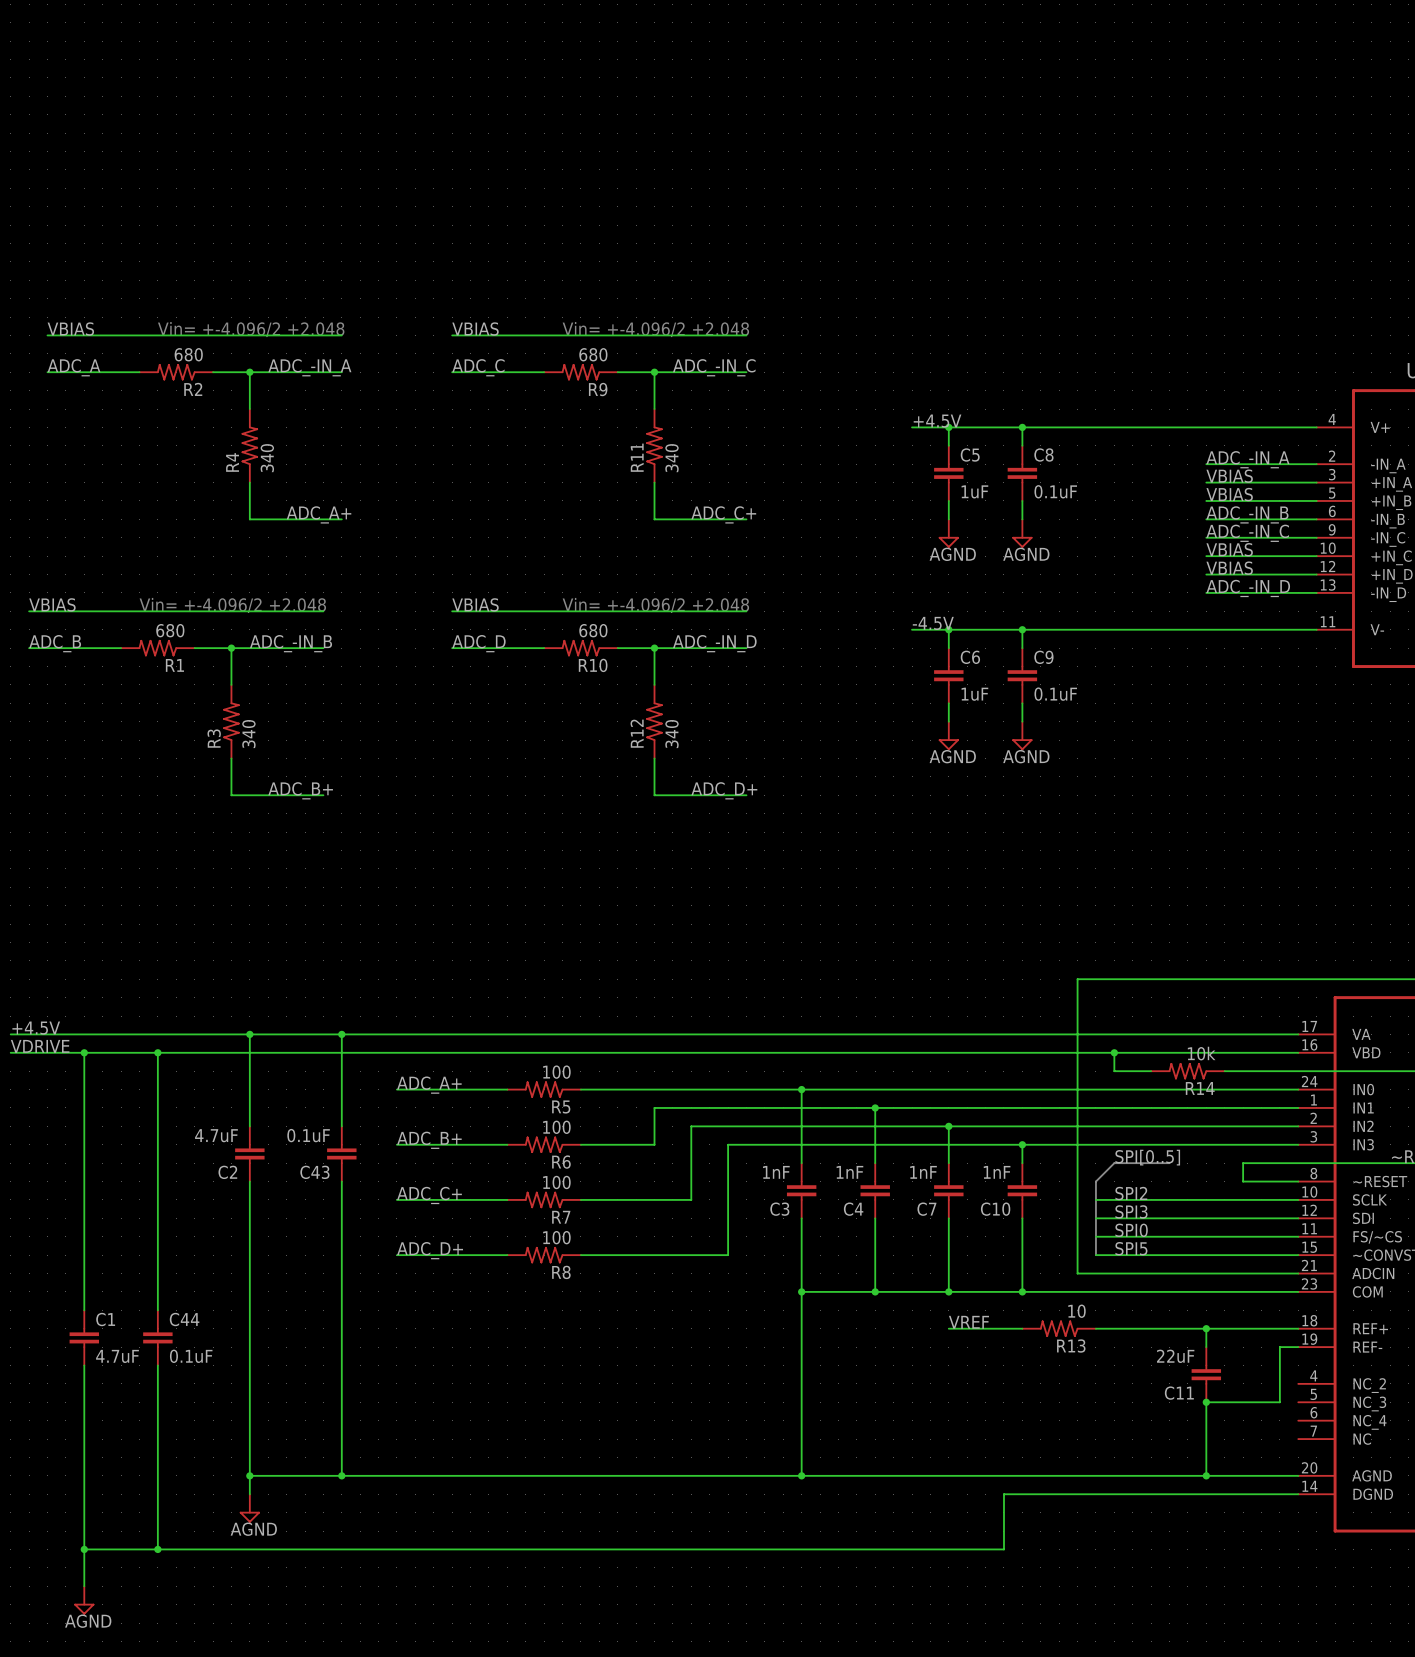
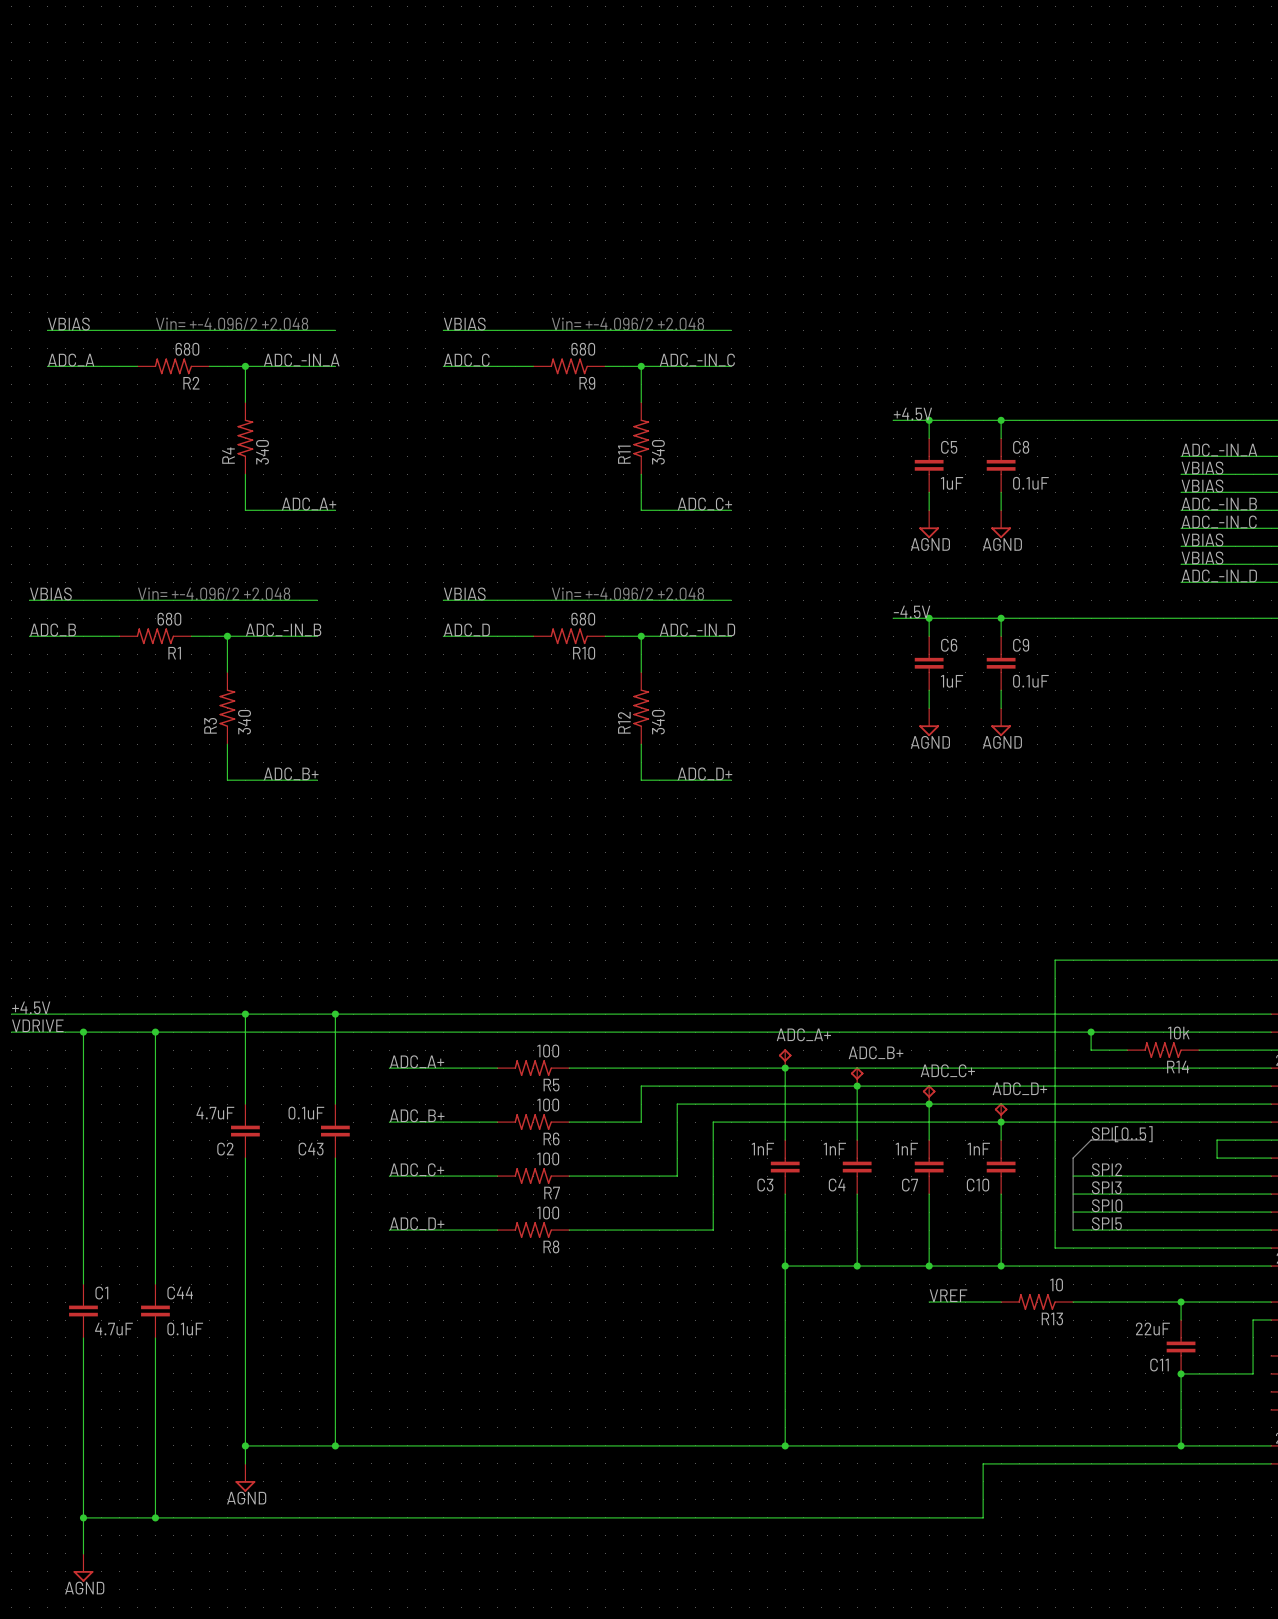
ADC_A+: none -> (785, 1058)
ADC_B+: none -> (857, 1076)
ADC_C+: none -> (929, 1094)
ADC_D+: none -> (1001, 1112)

